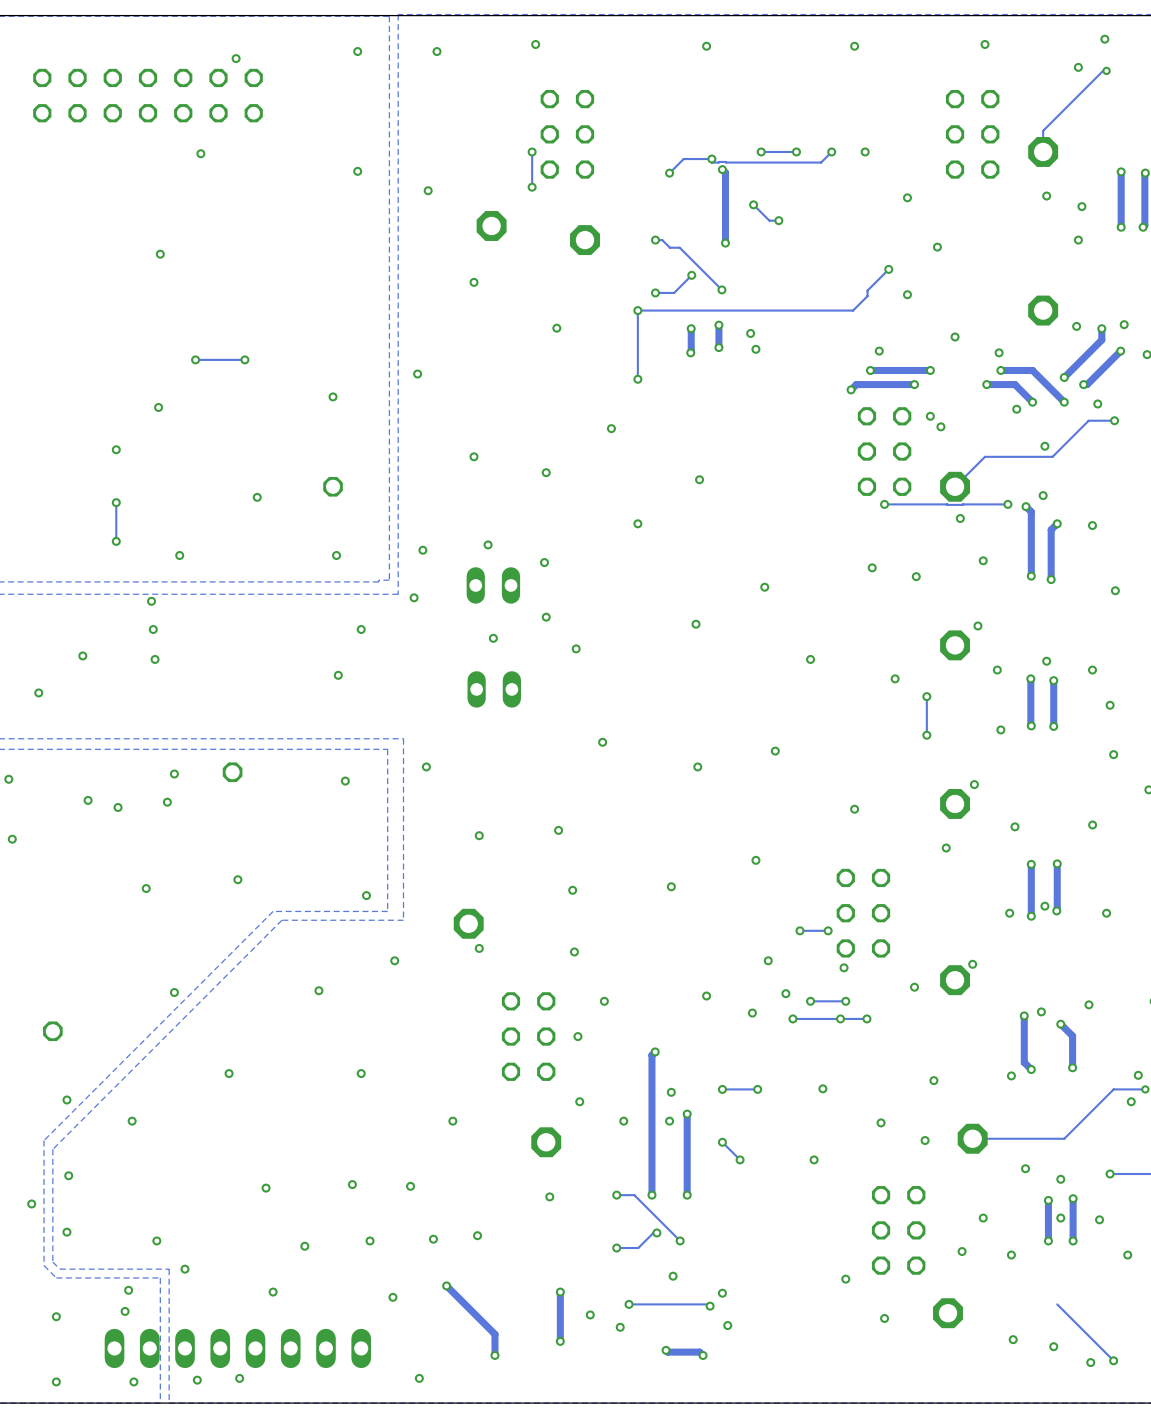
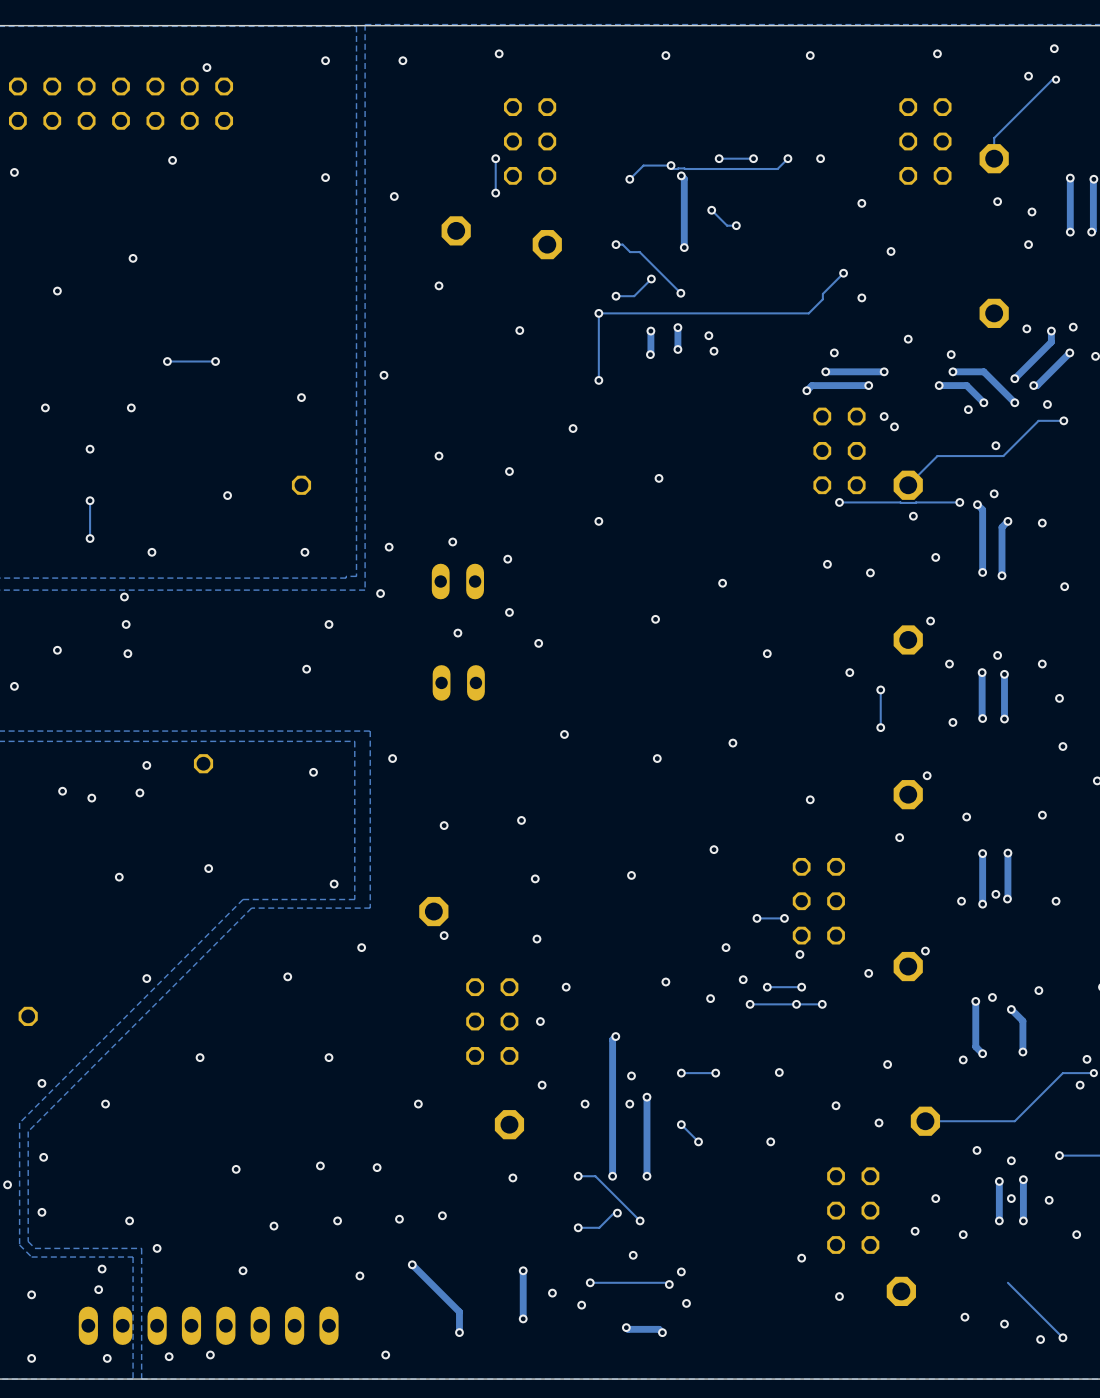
via: none -> (14, 172)
via: none -> (57, 291)
via: none -> (45, 407)

